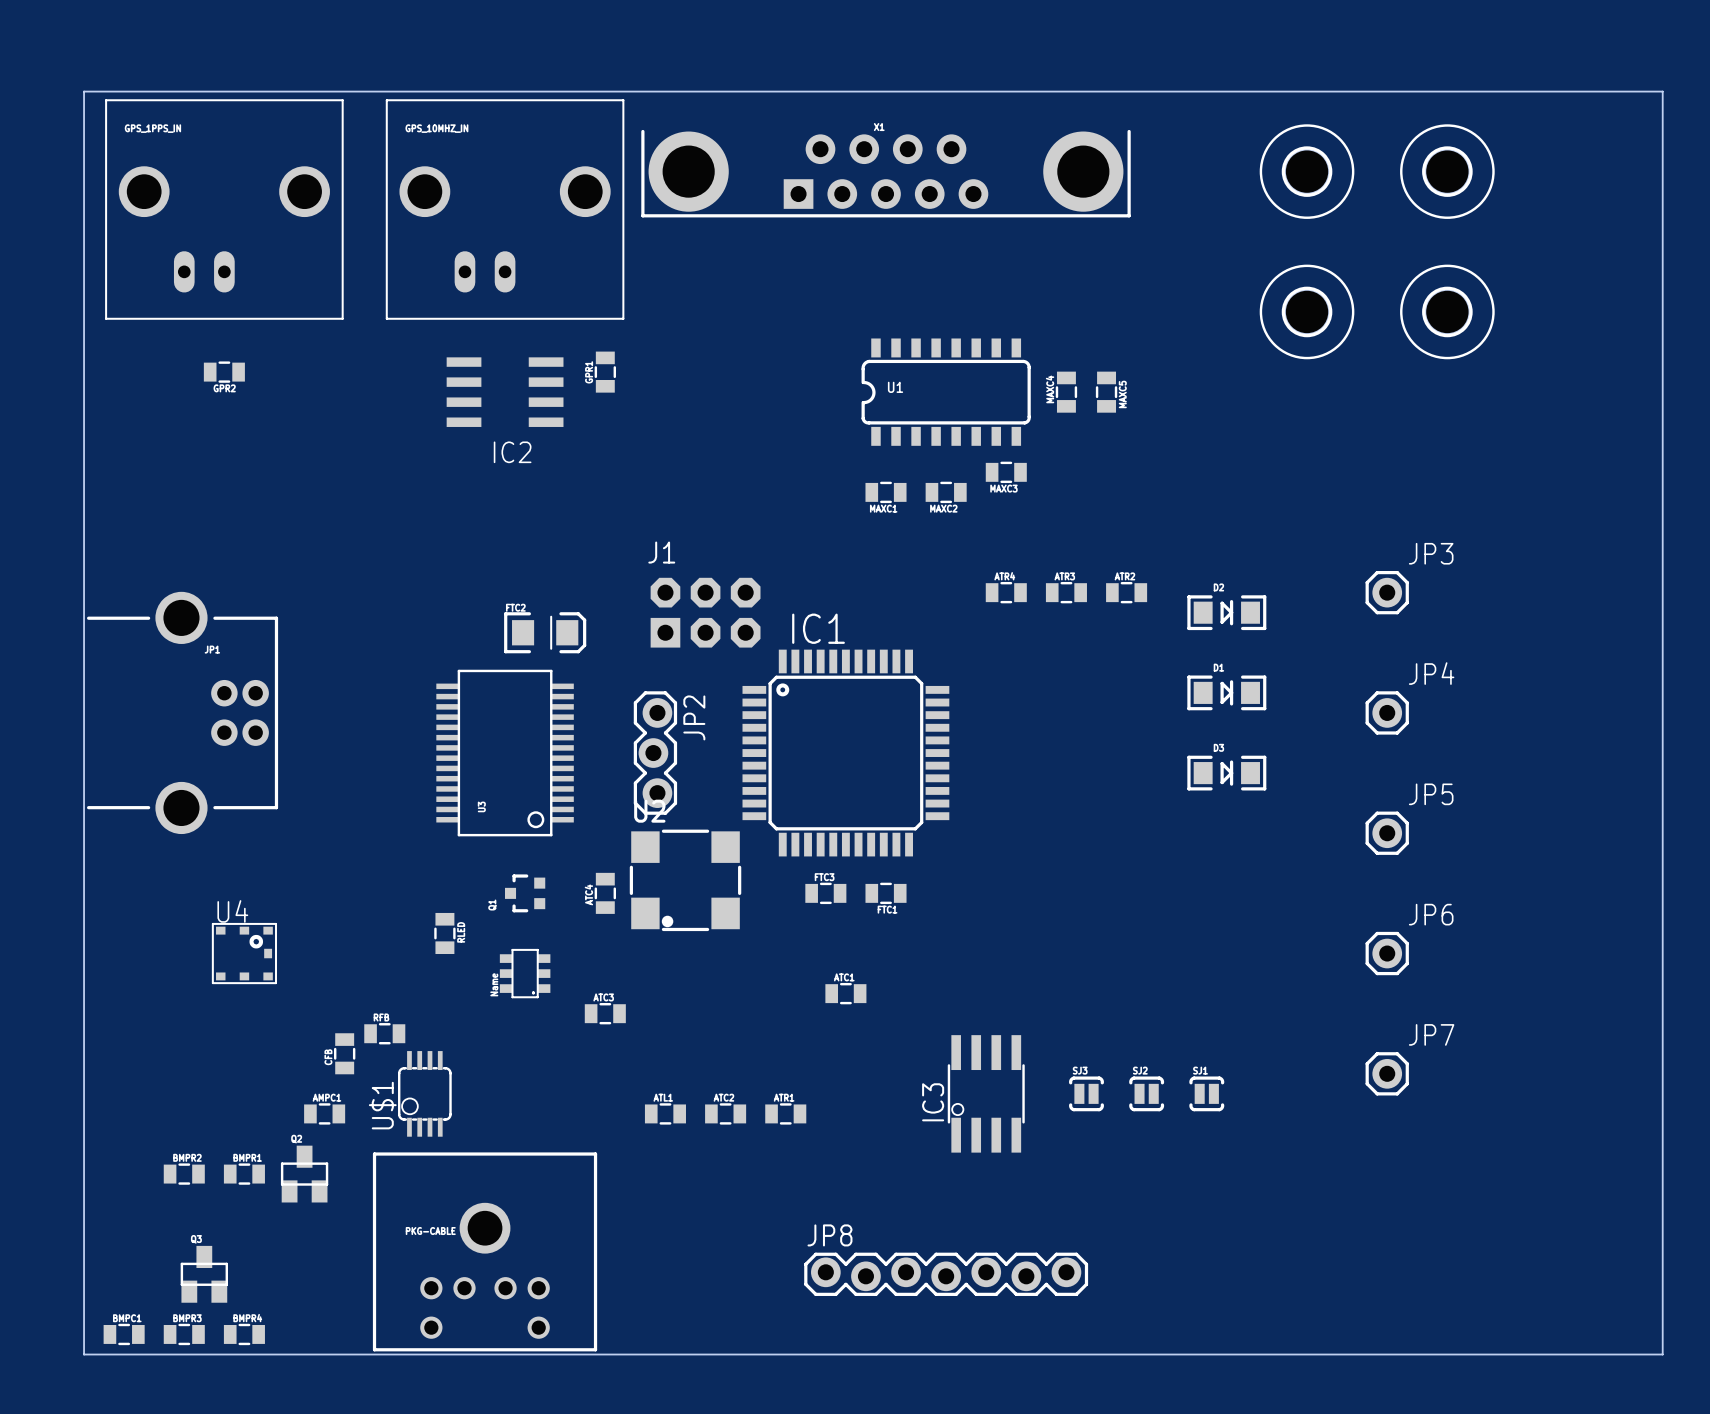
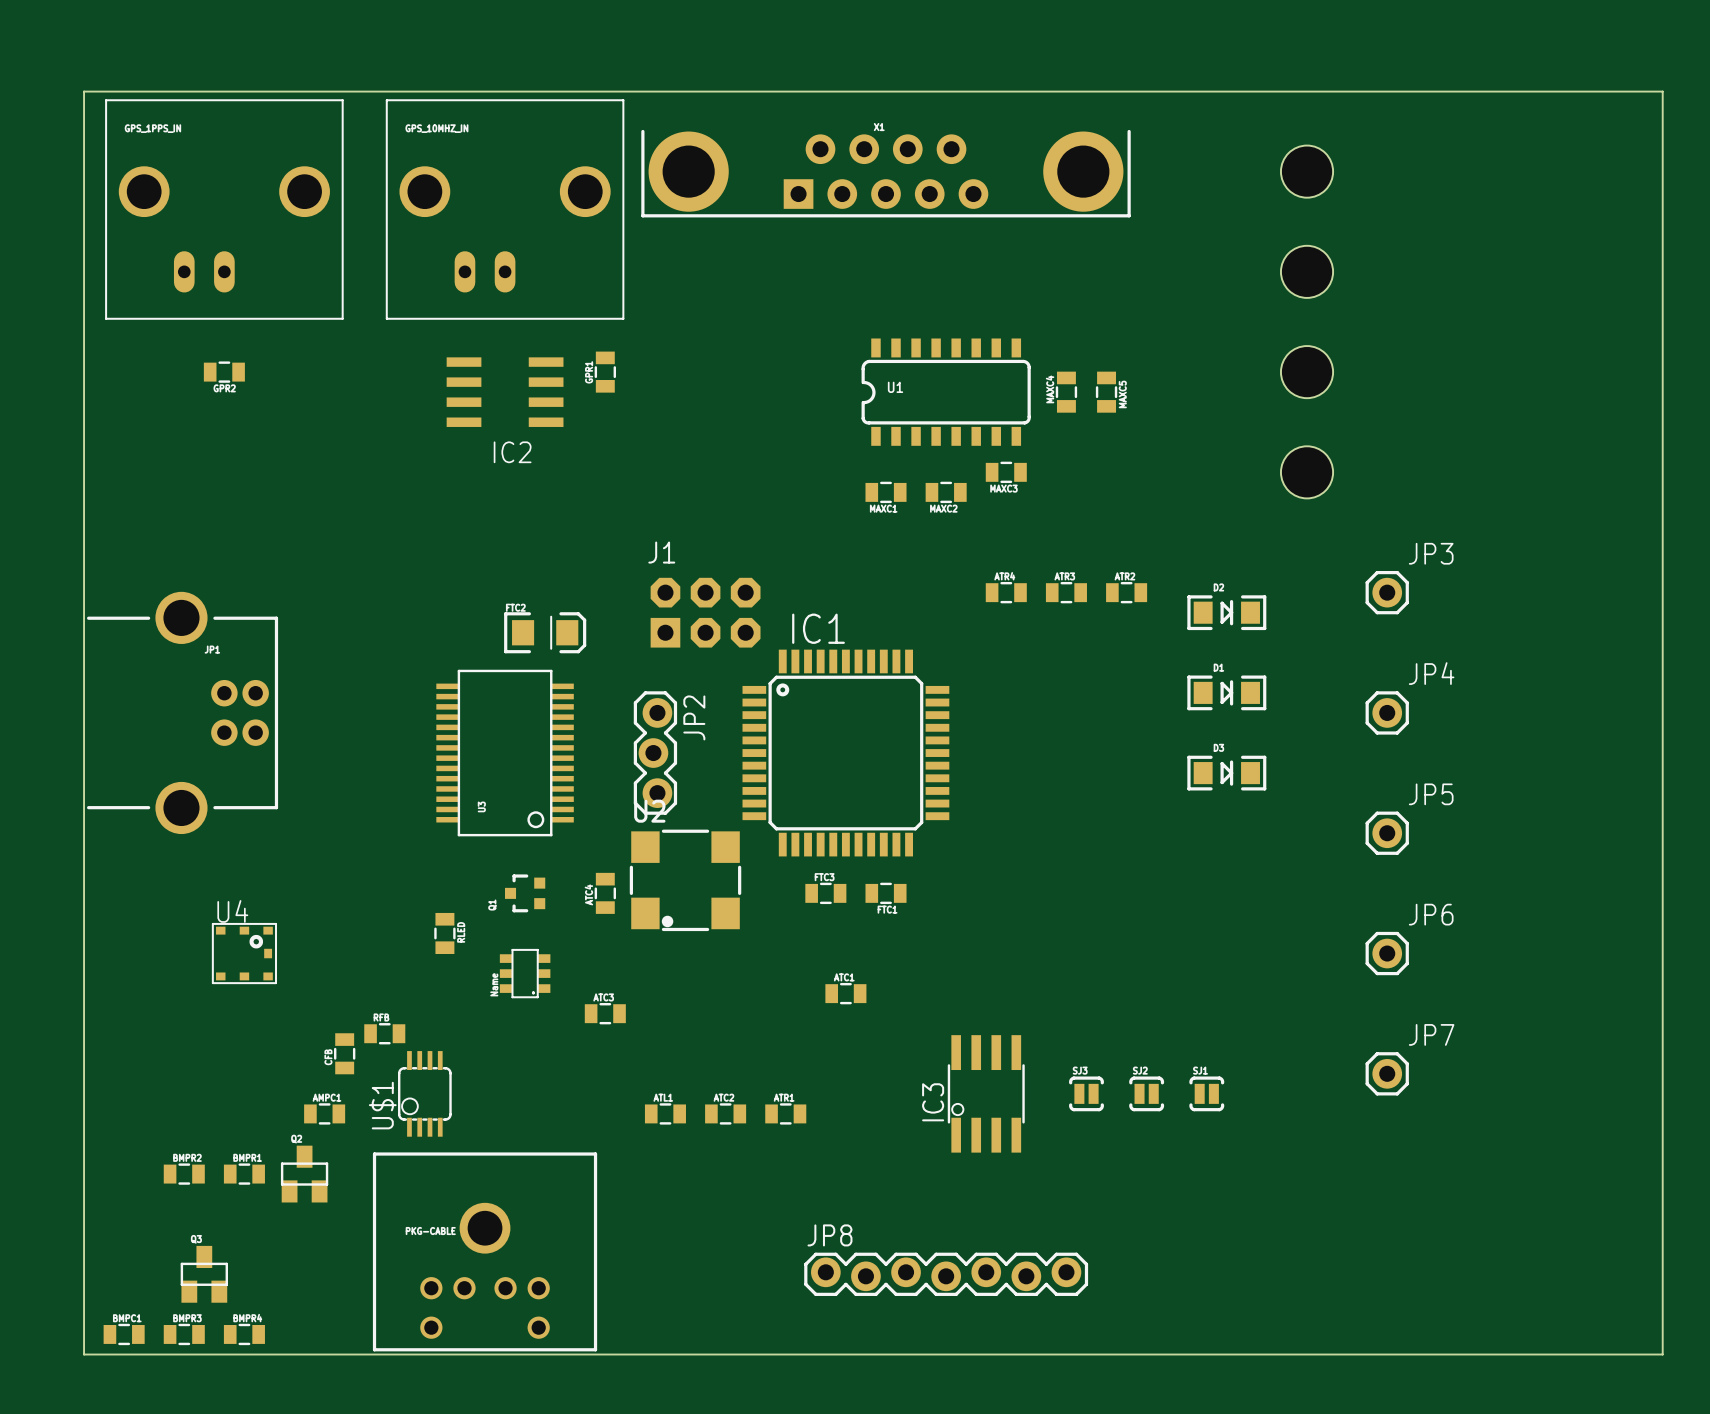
part footprint: [1259, 124, 1355, 219] -> [1280, 145, 1334, 198]
part: (1447, 171) -> none
part: none -> (1307, 271)
part: (1307, 311) -> none
part: (1447, 311) -> none
part: none -> (1307, 372)
part: none -> (1307, 472)

